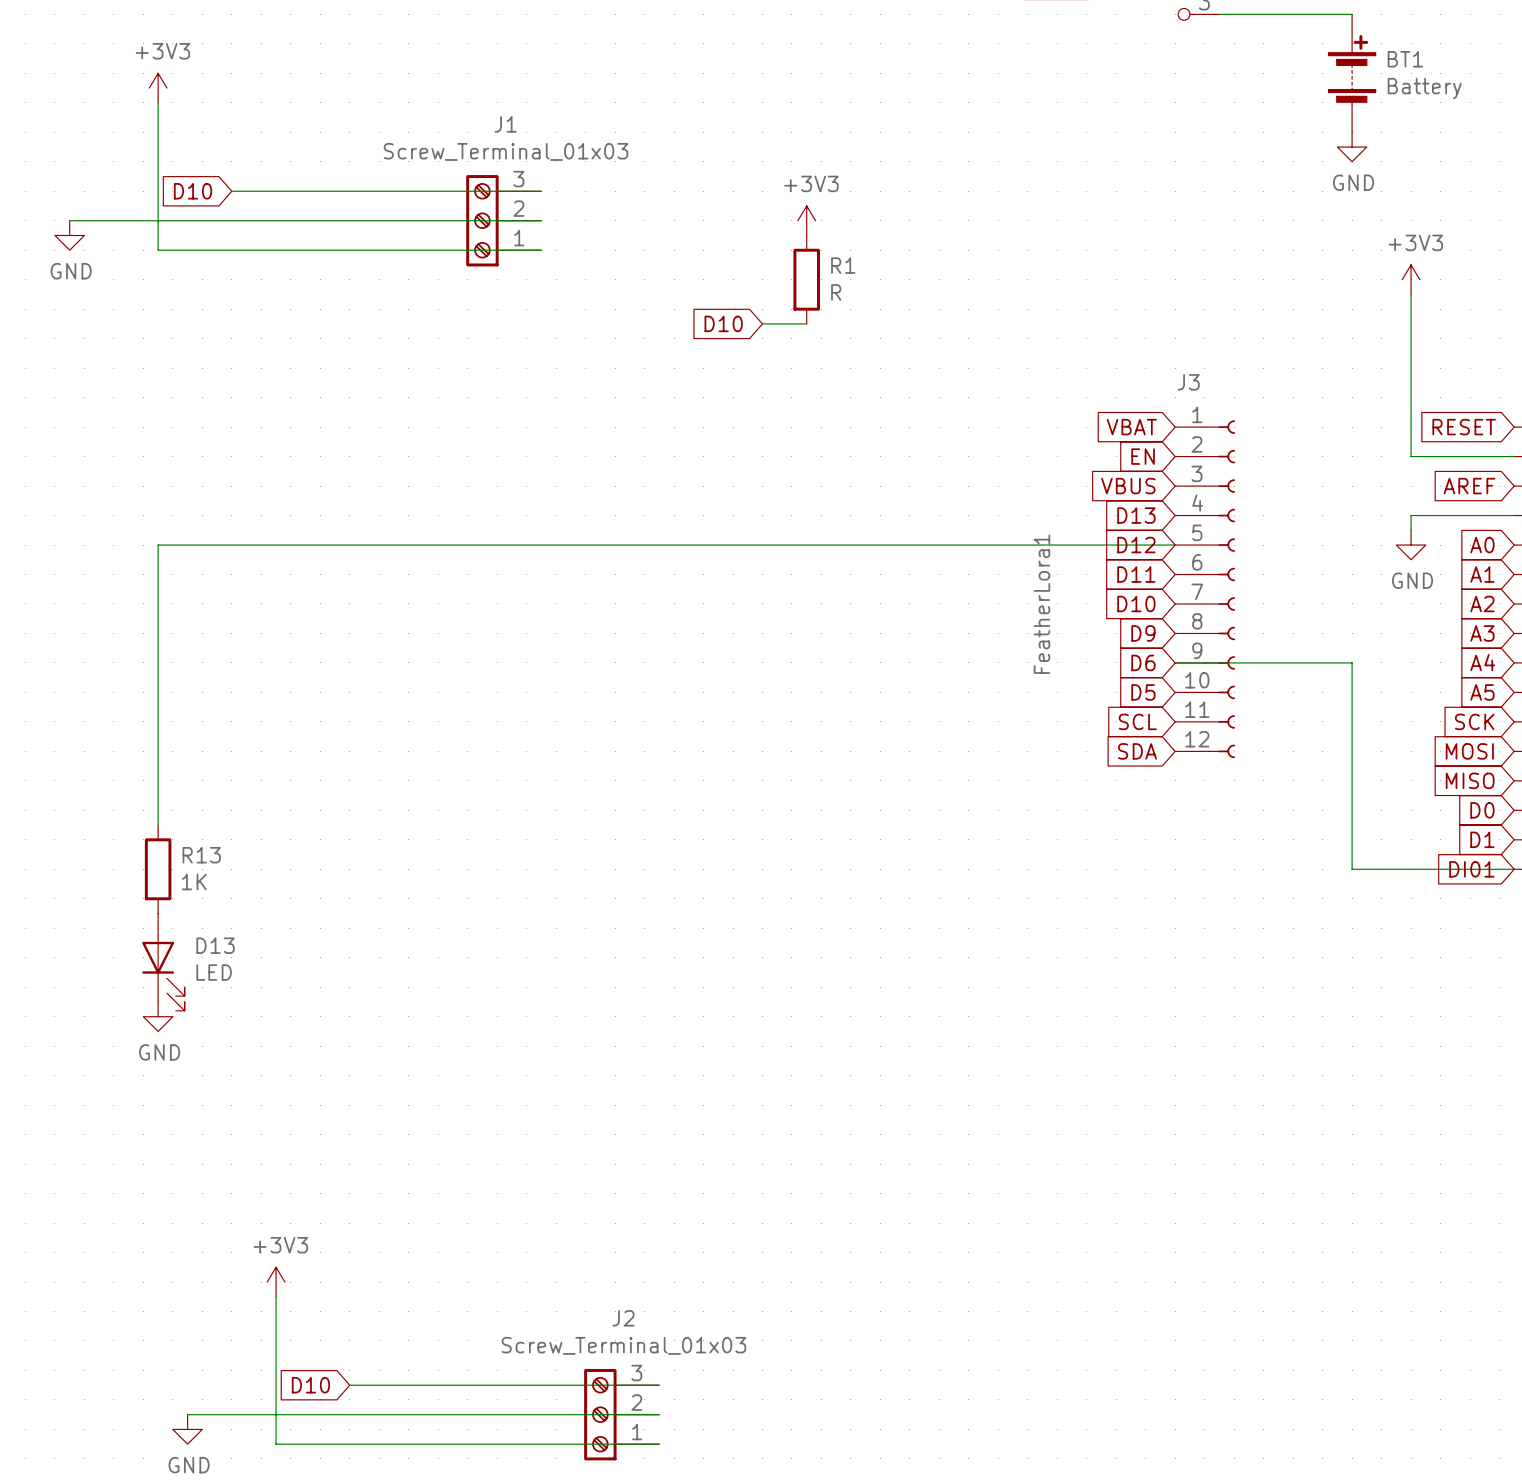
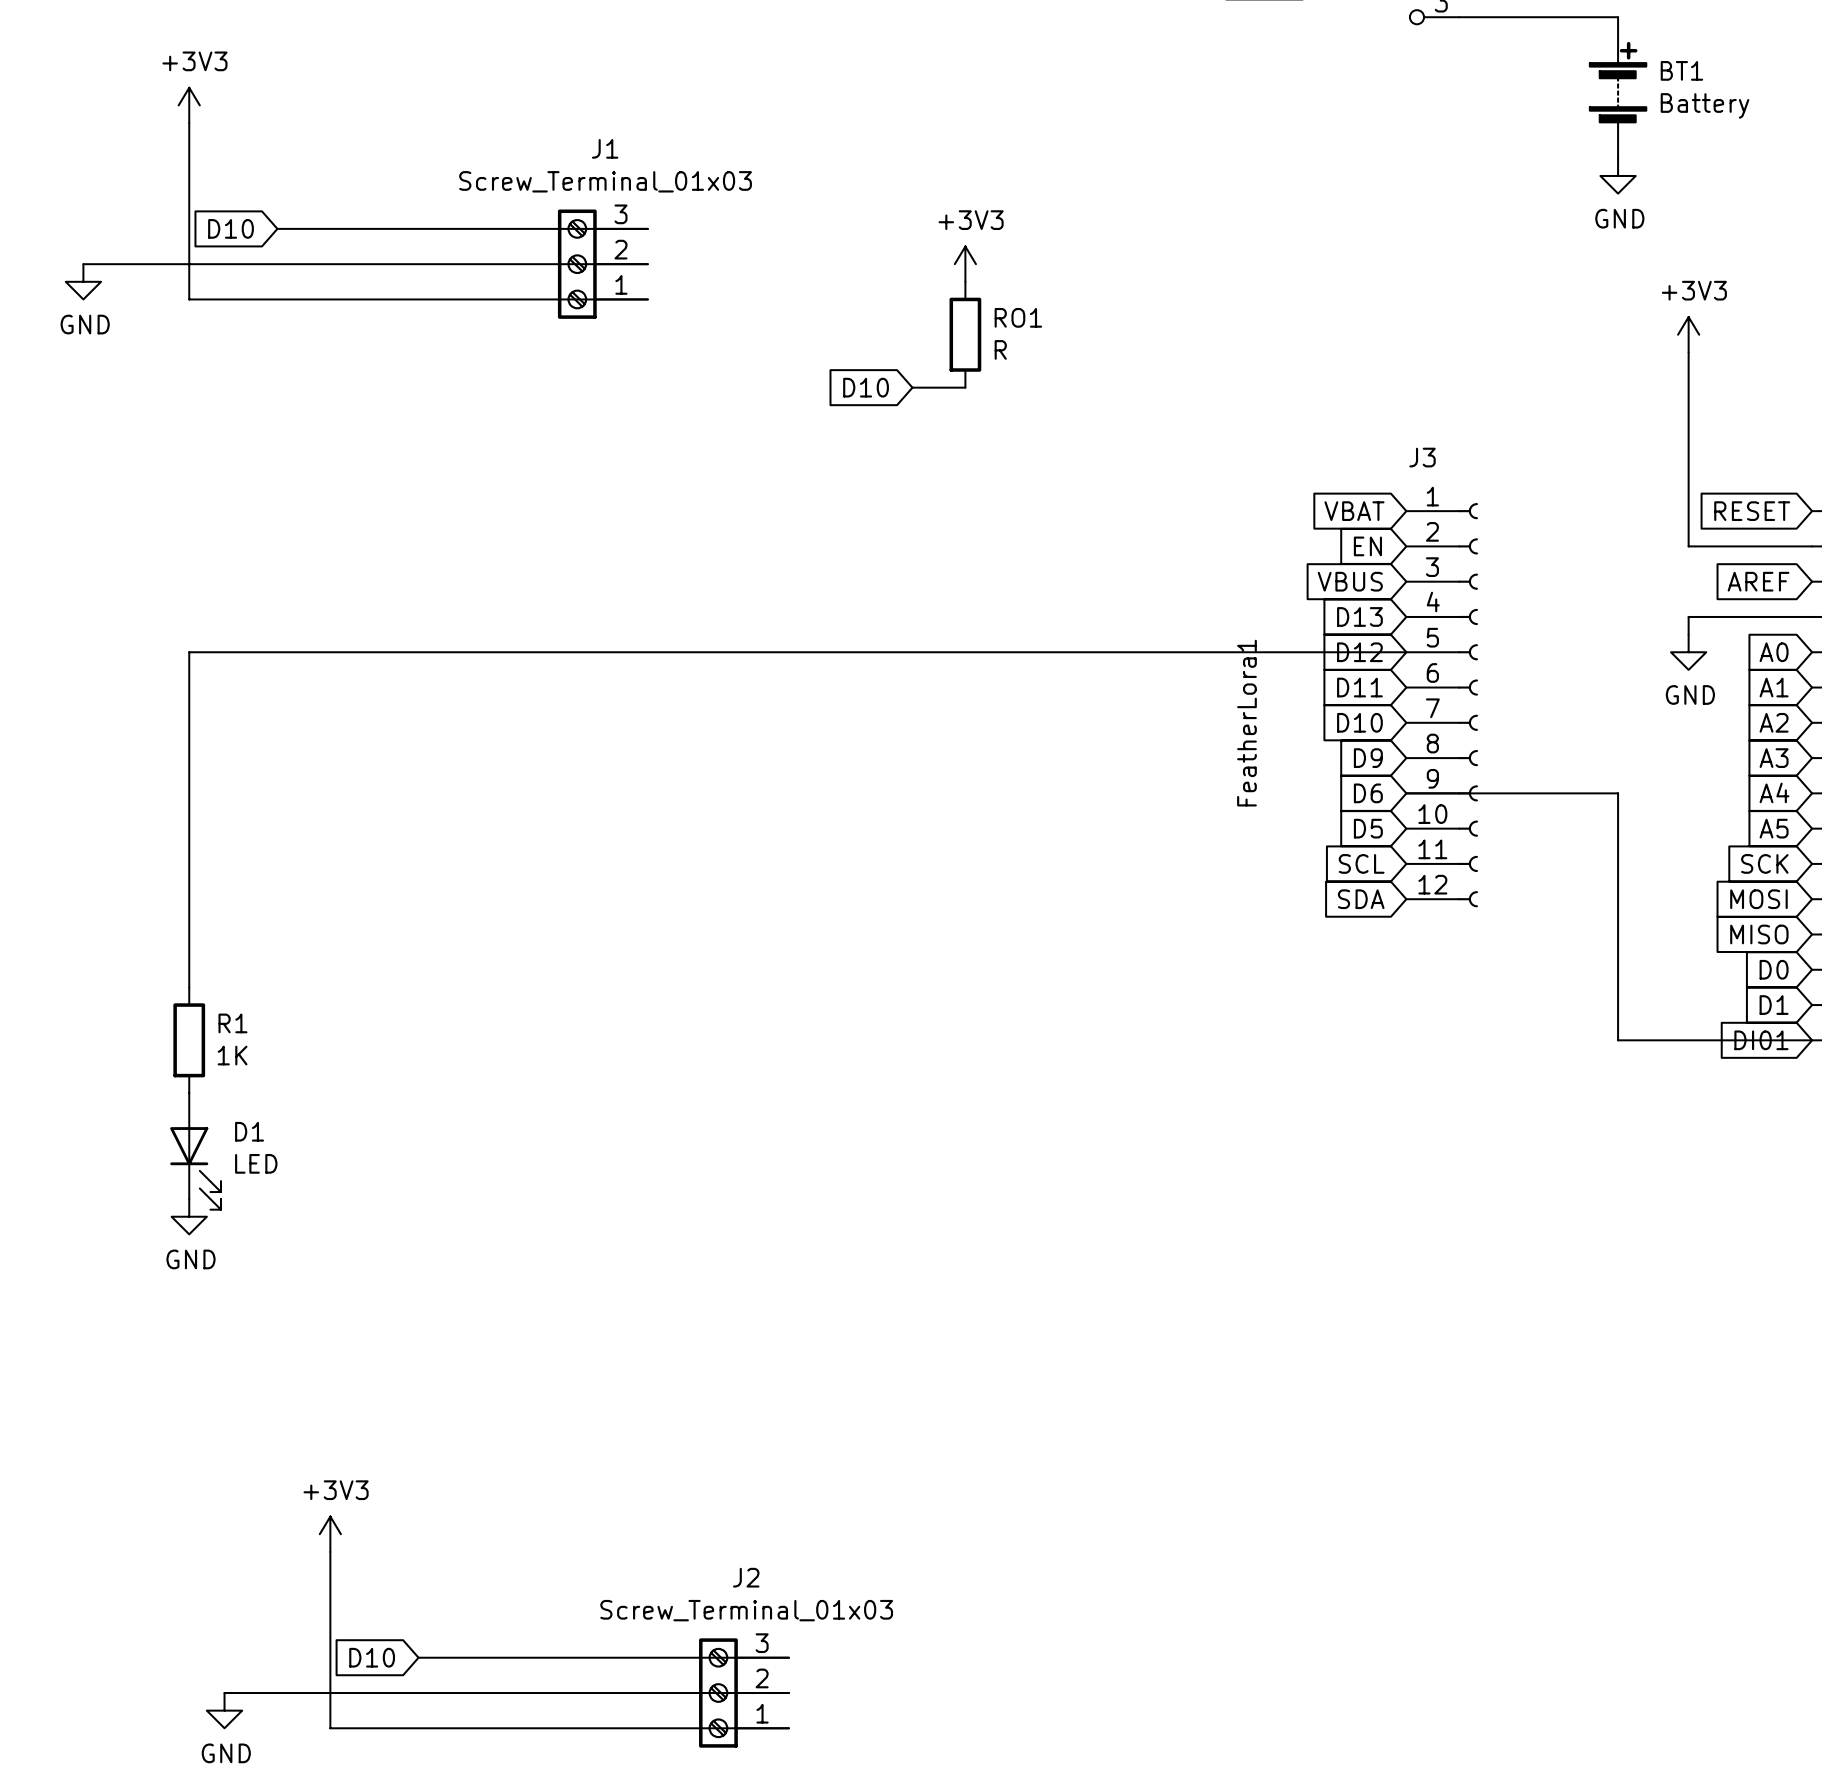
R1 name: R1 (843, 265) -> RO1 (1018, 317)
R13 name: R13 (201, 855) -> R1 (232, 1023)
D13 name: D13 (215, 945) -> D1 (249, 1131)

